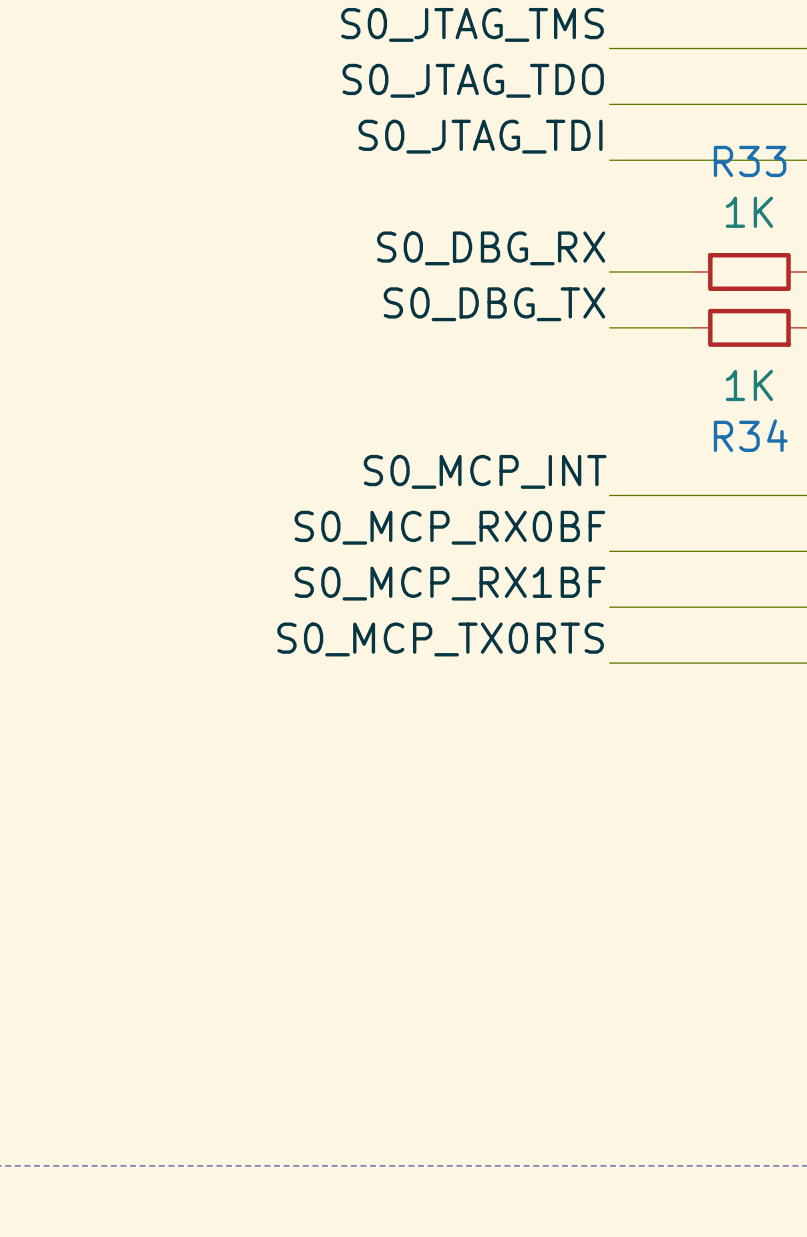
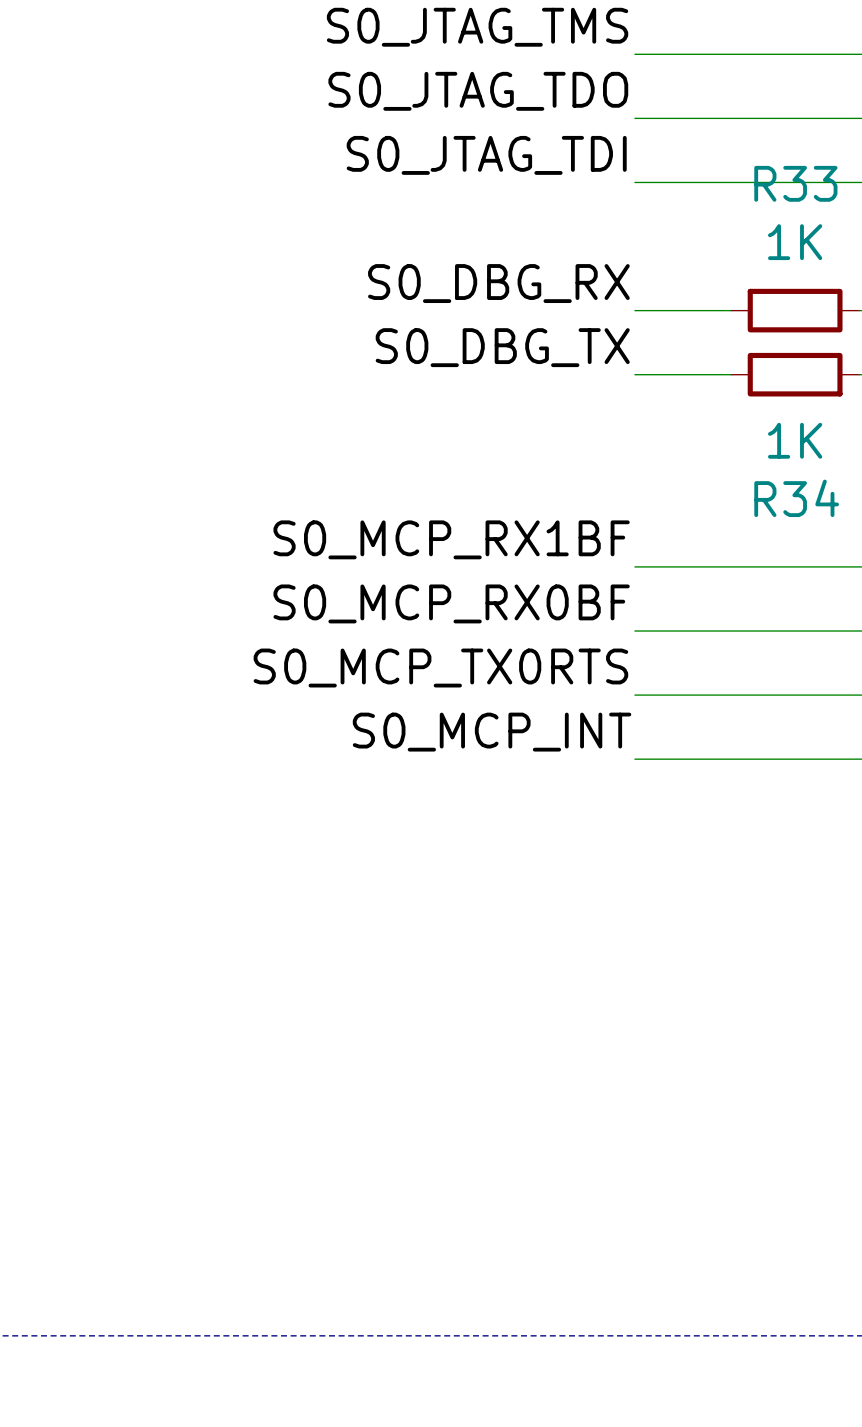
label: S0_MCP_INT (485, 471) -> S0_MCP_RX1BF (451, 539)
label: S0_MCP_RX1BF (449, 583) -> S0_MCP_TX0RTS (440, 668)
label: S0_MCP_TX0RTS (440, 639) -> S0_MCP_INT (492, 732)

